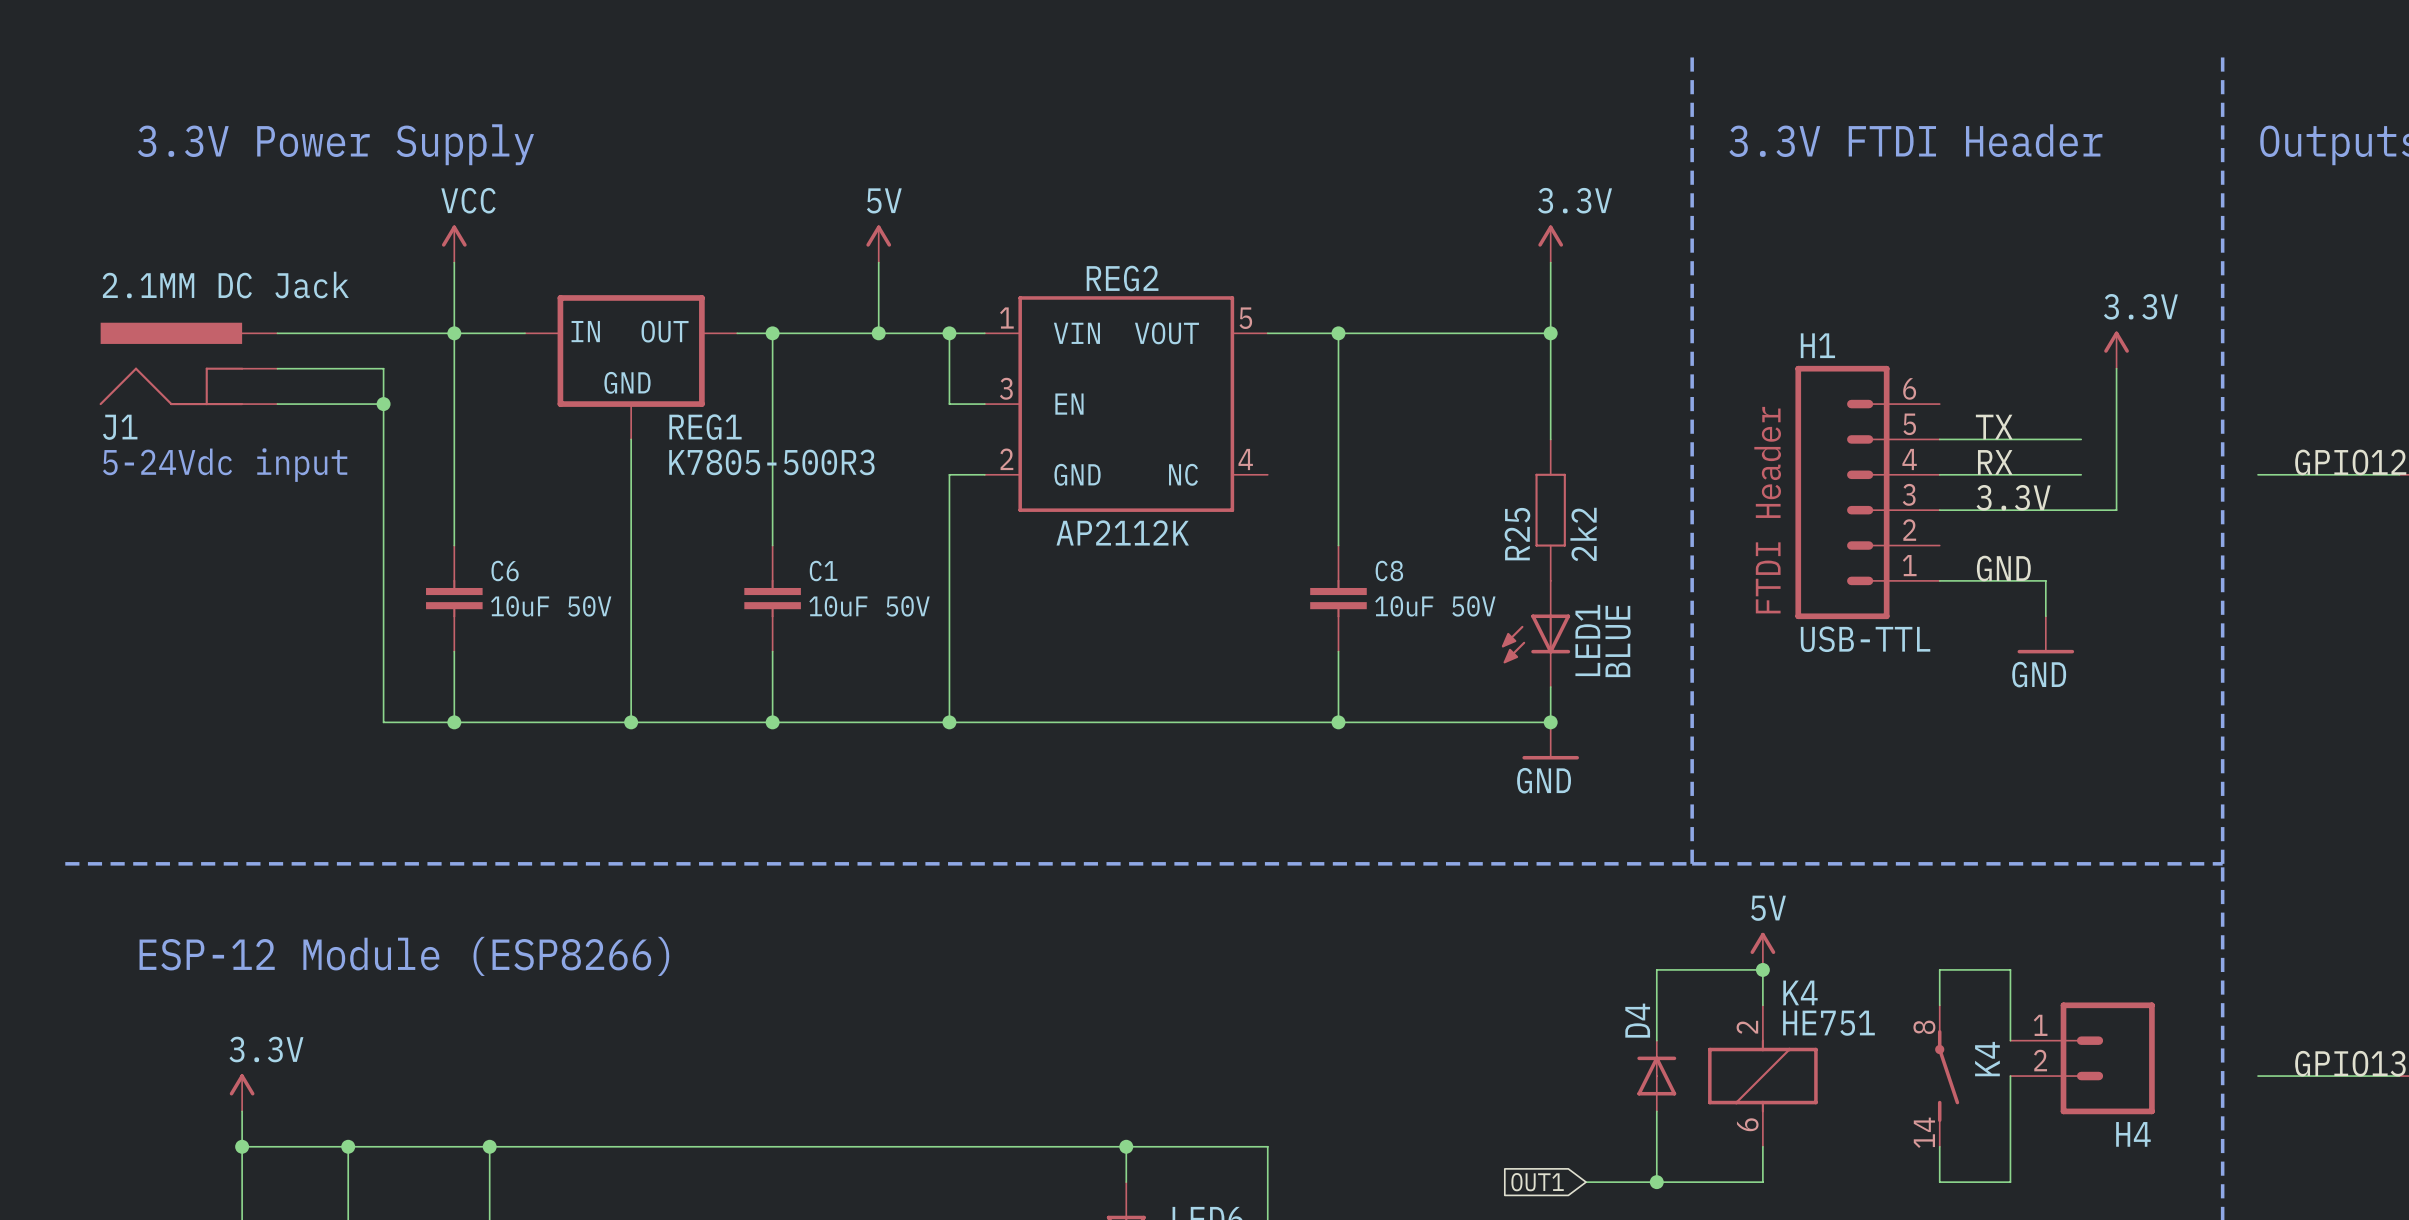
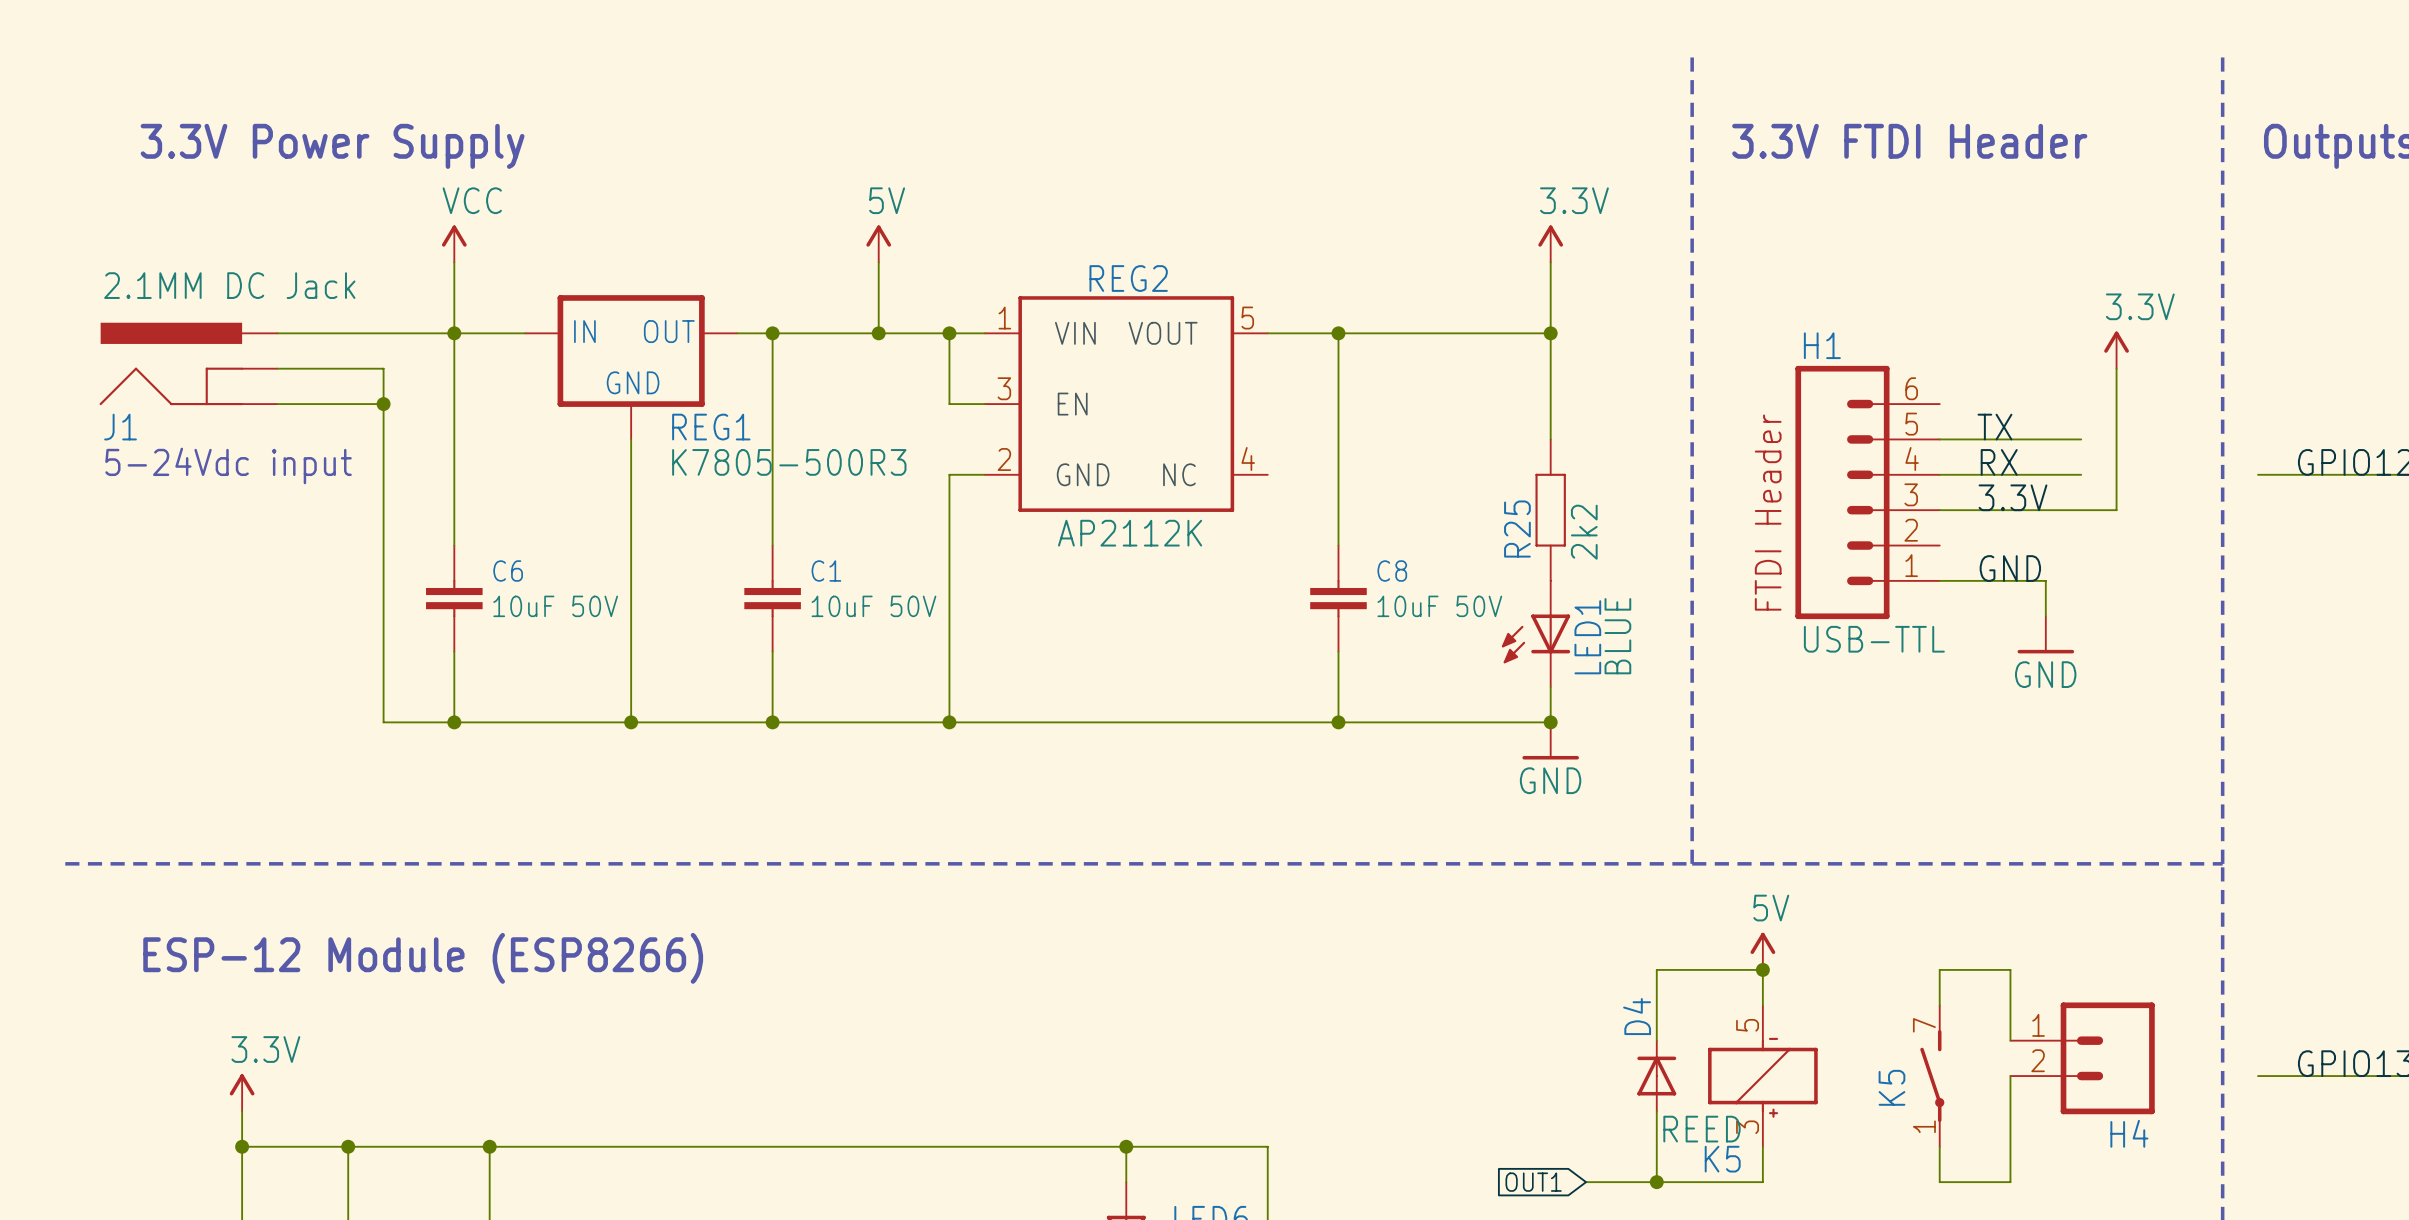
K4: HE751 (1762, 1076) -> none
K5: none -> REED (1762, 1076)
K5: none -> (1932, 1076)
K4: (1947, 1076) -> none

